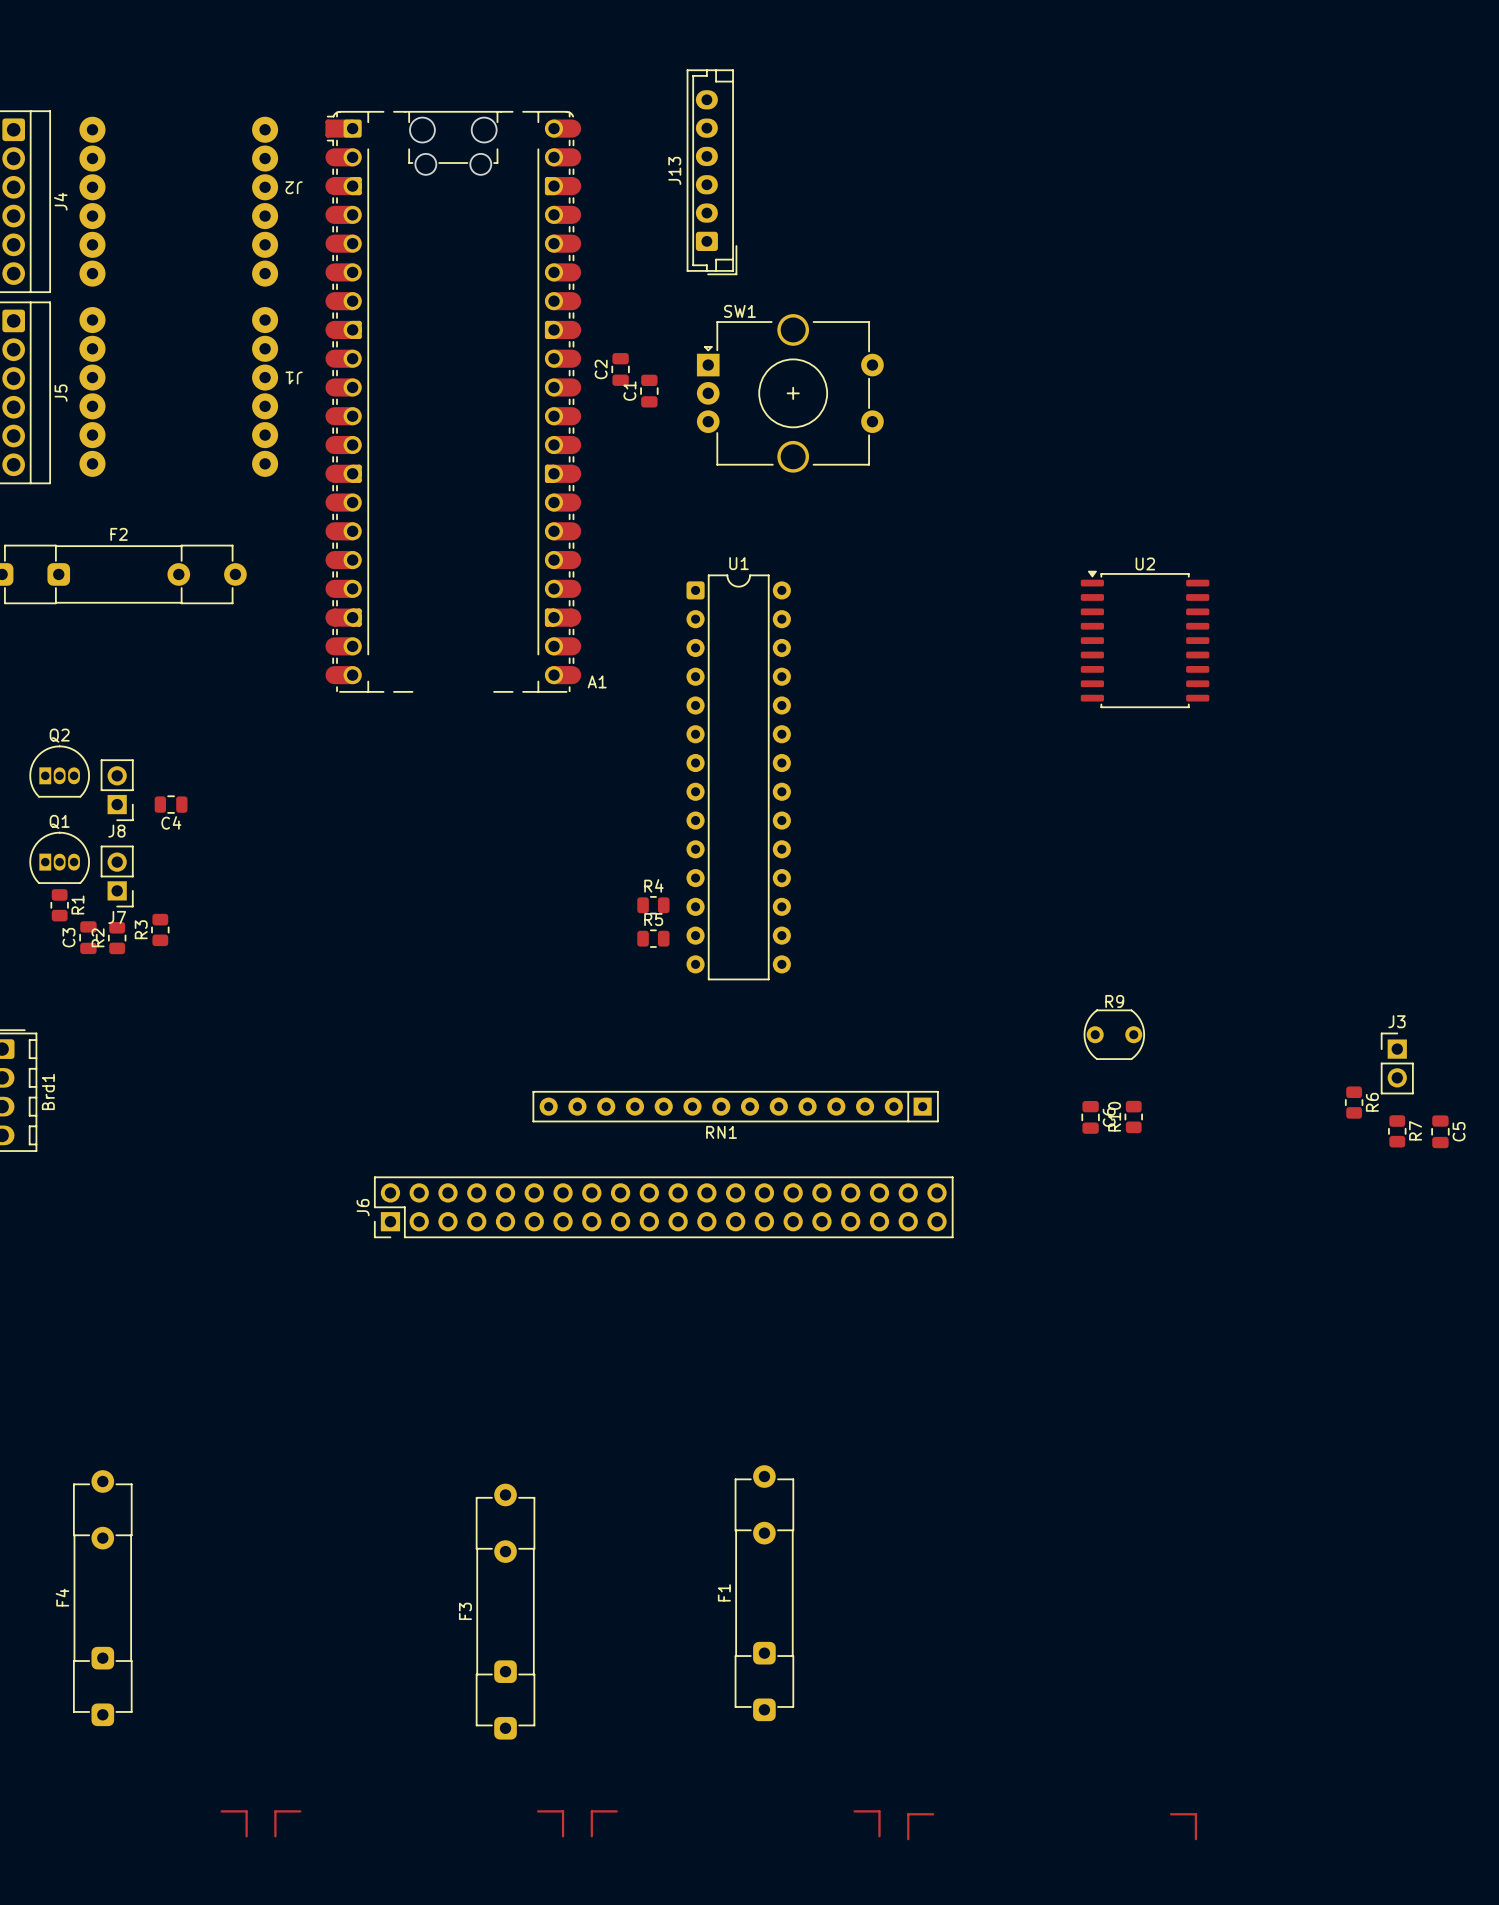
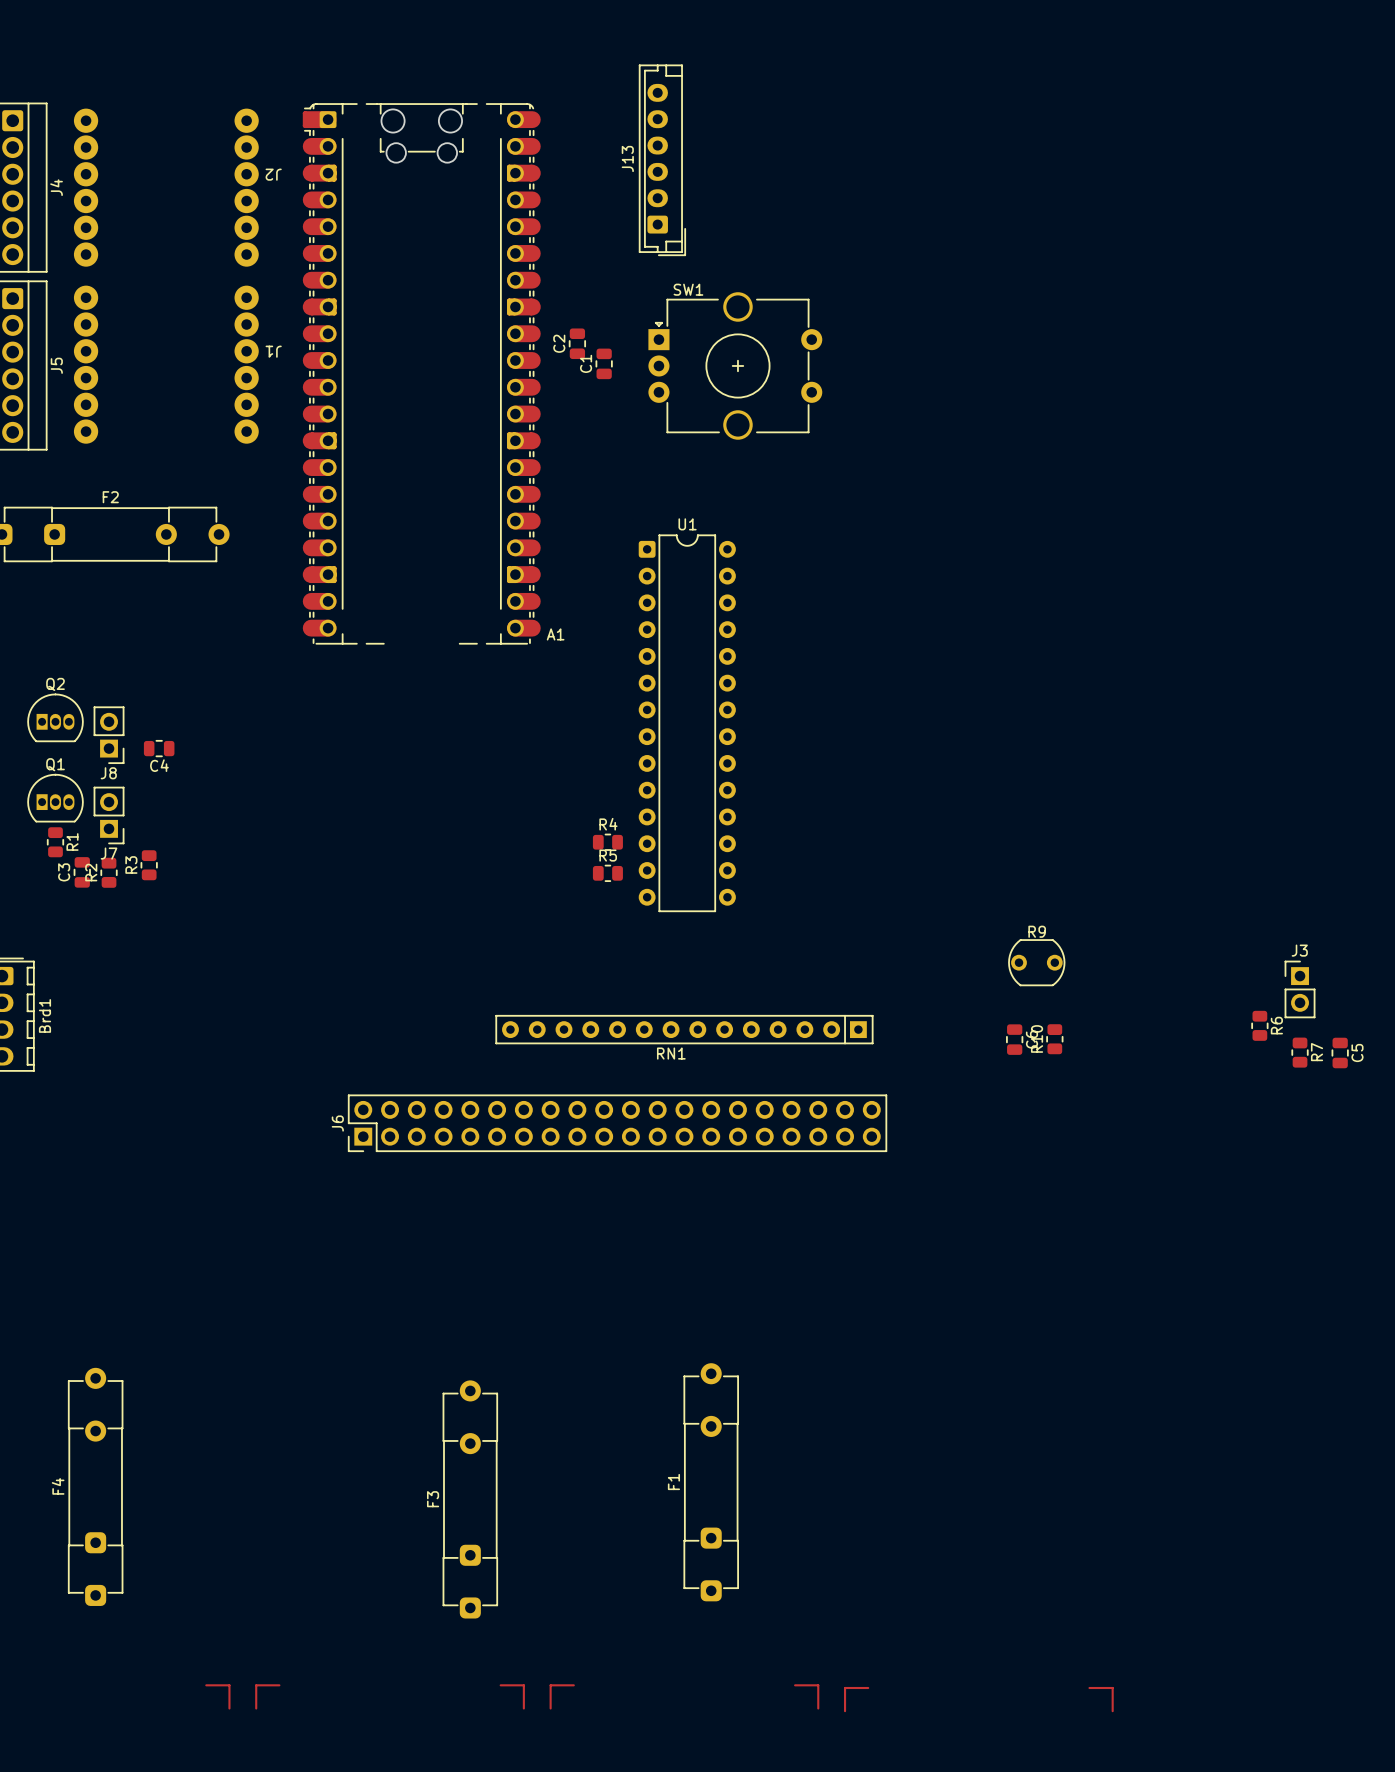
U2: (1145, 639) -> none

